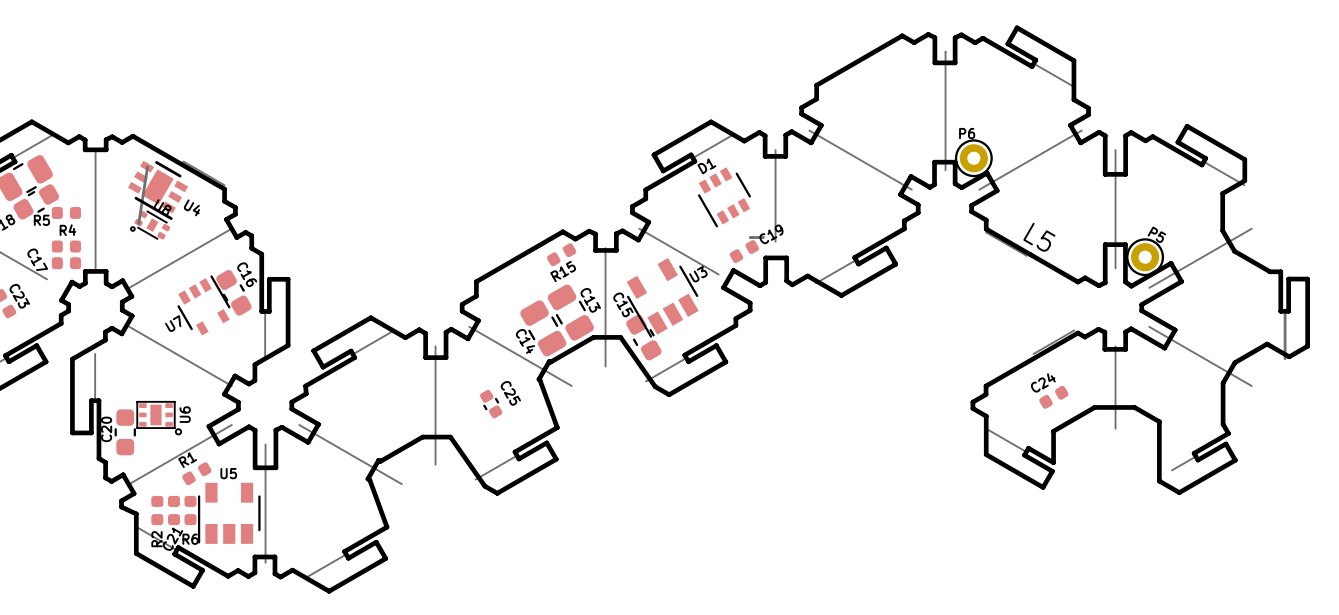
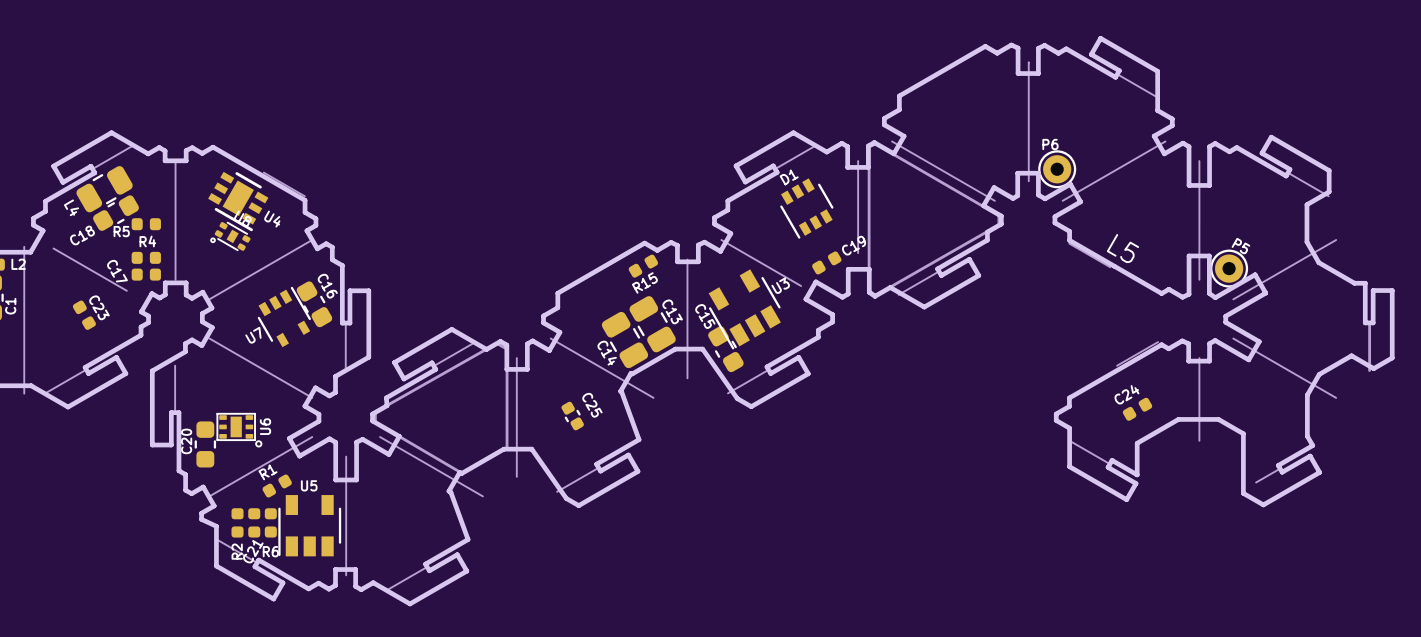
line: none -> (875, 144) (869, 146) (869, 290) (875, 295) (998, 224) (998, 215) (875, 144)
line: (147, 166) (138, 223) -> none
line: (750, 237) (763, 237) -> none
line: none -> (496, 343) (507, 349) (507, 447) (461, 473) (375, 422) (375, 412) (496, 343)

